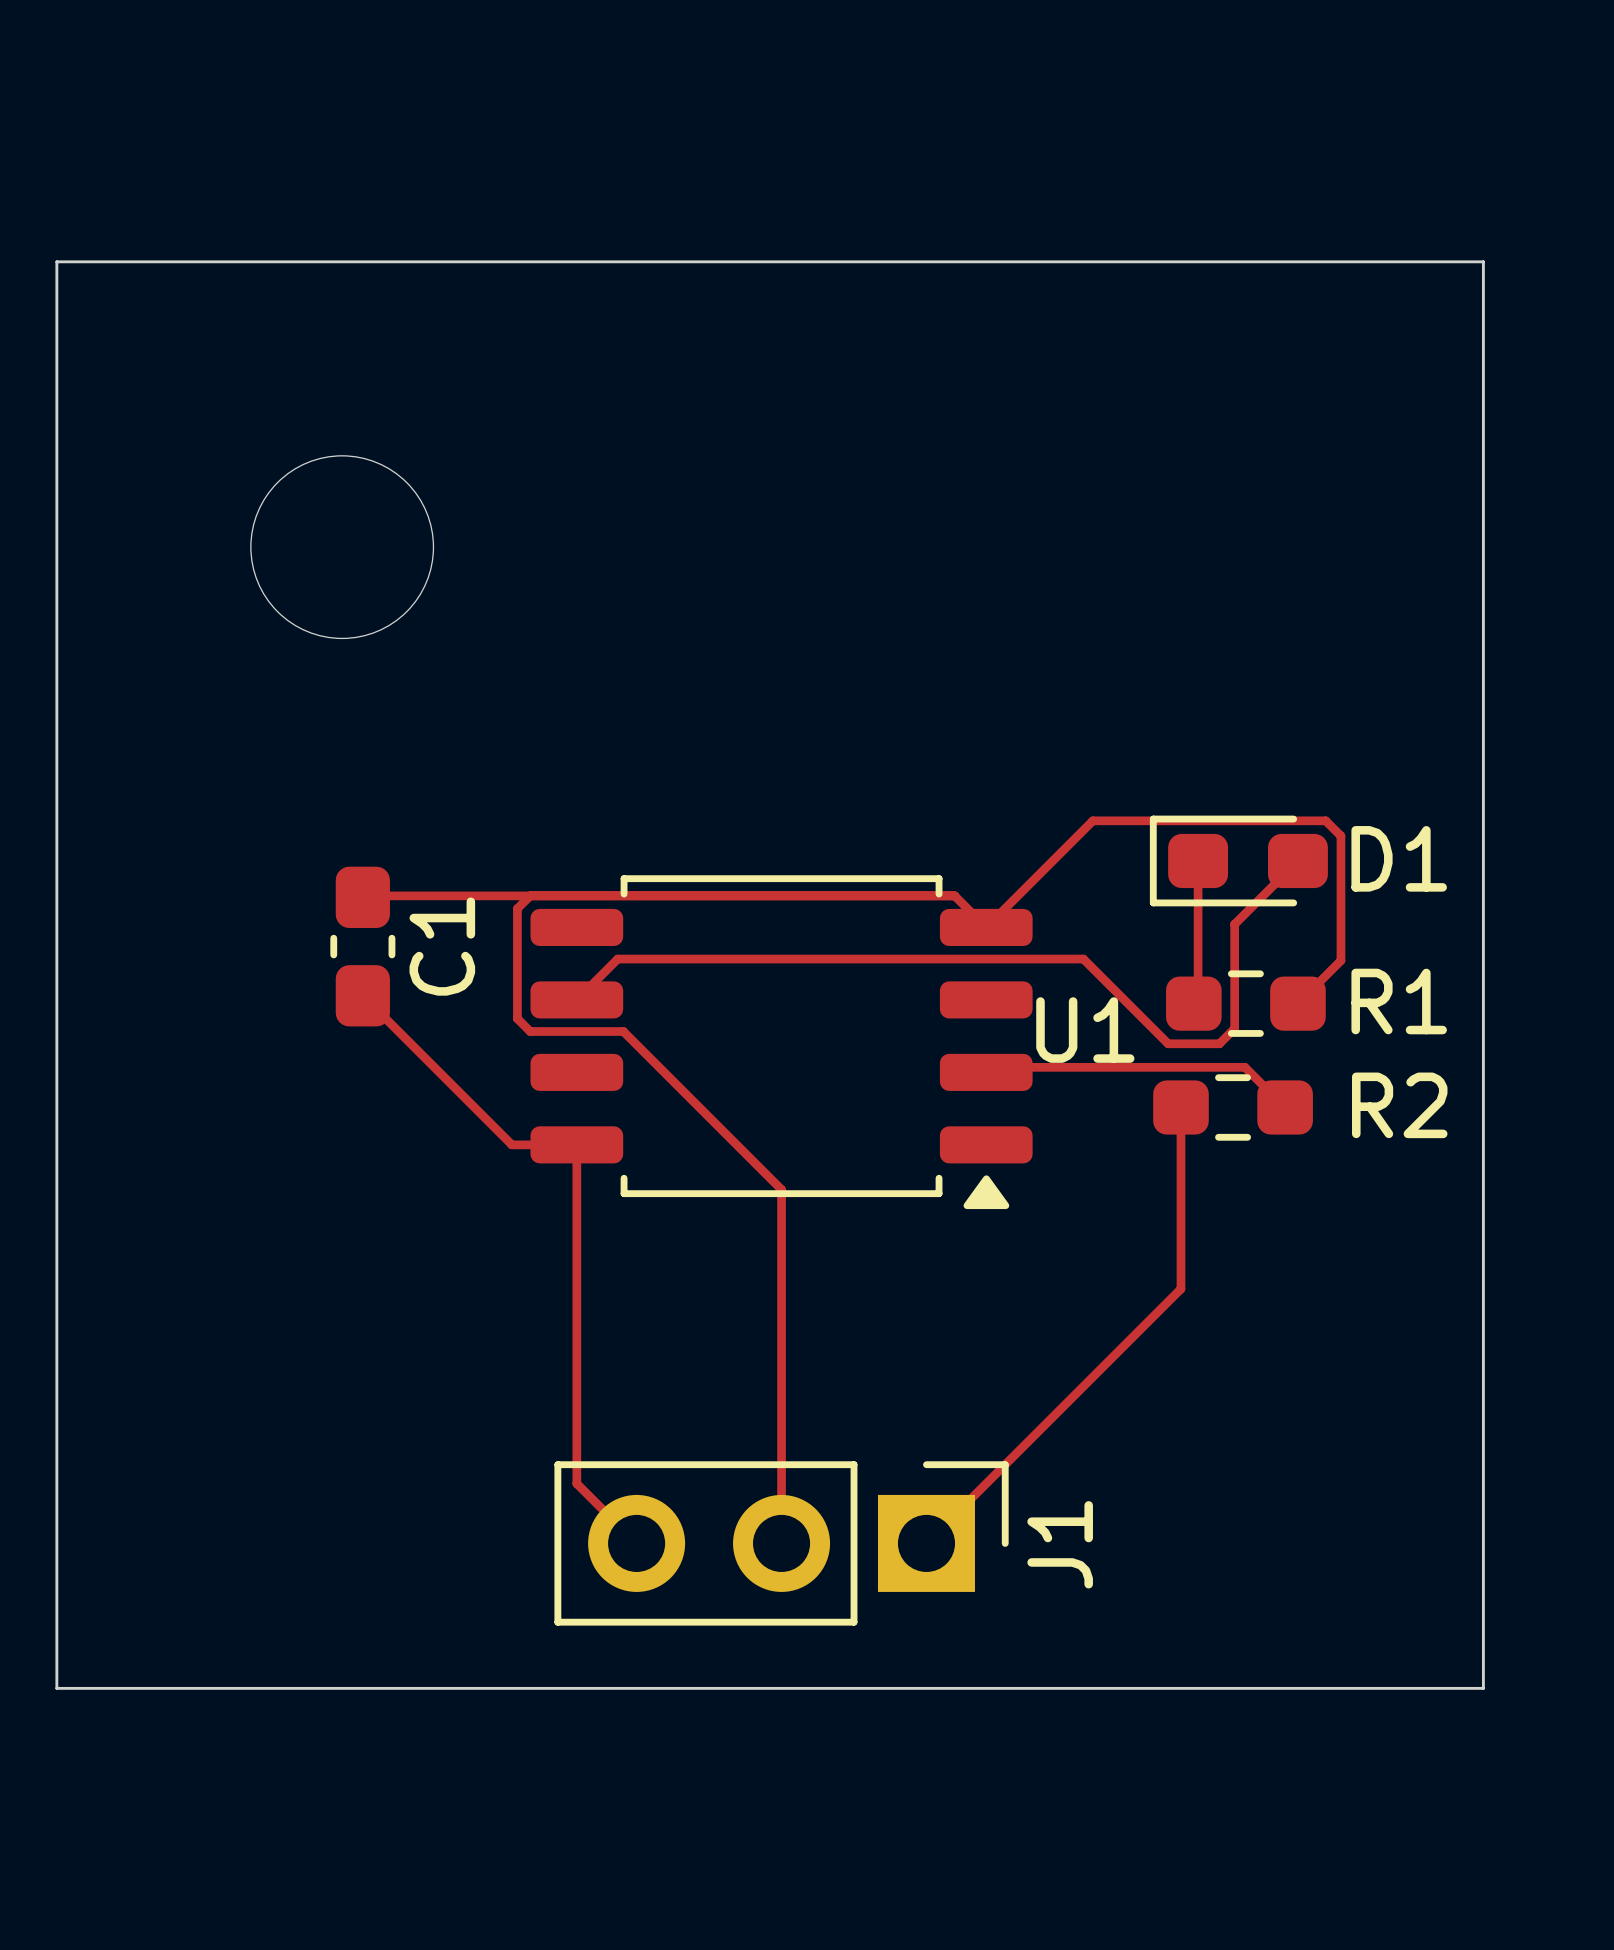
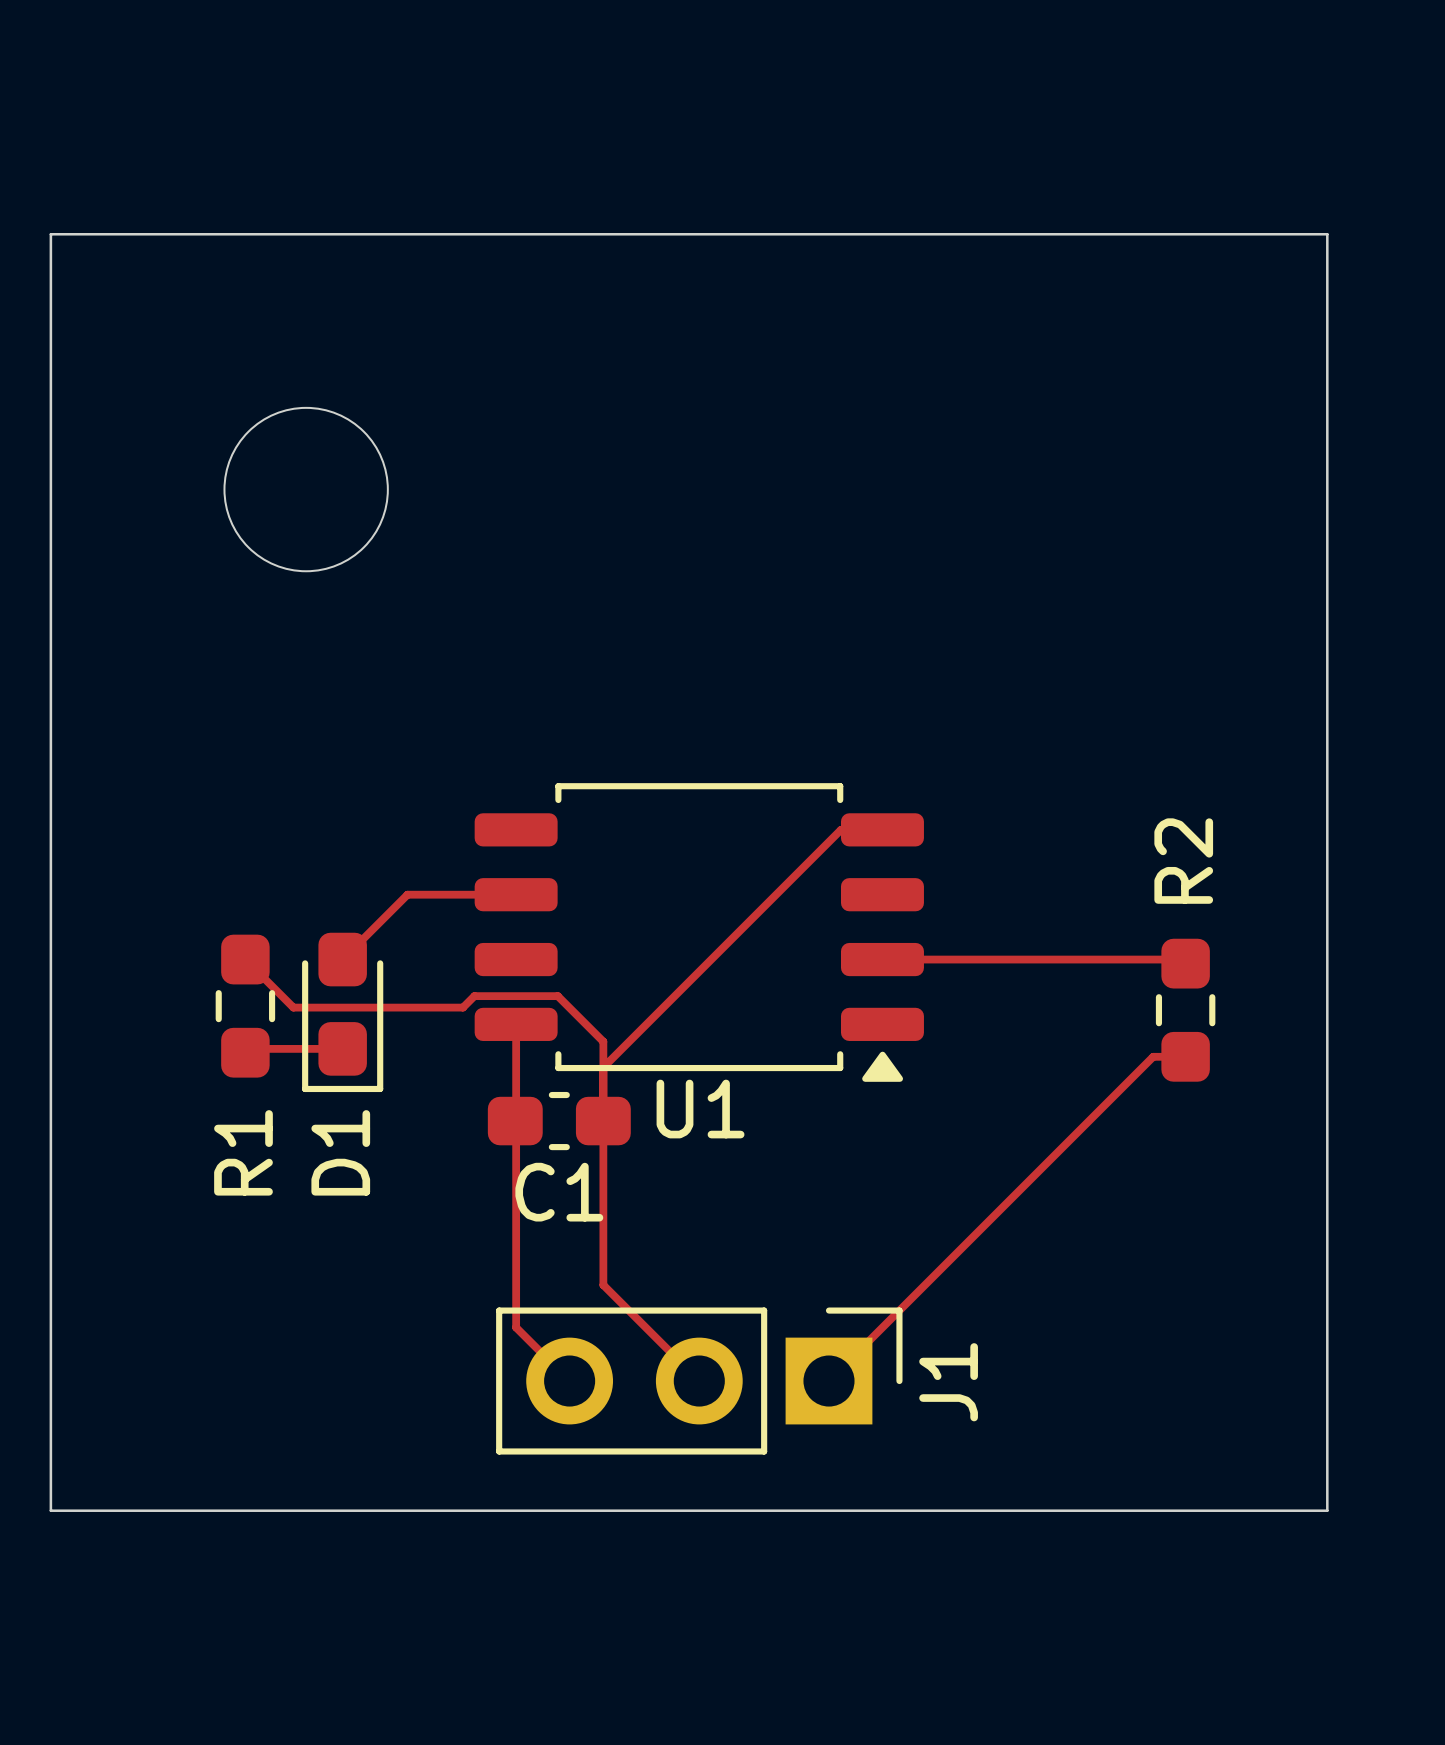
D1 name position: D1 (1399, 858) -> D1 (340, 1152)
top track: (1198, 860) (1198, 999) (1193, 1003) -> none
D1 rotation: 0° (1238, 860) -> 90° counterclockwise (342, 1012)
D1 position: (1238, 860) -> (342, 1012)
top track: (1297, 860) (1234, 924) (1234, 1028) (1219, 1043) (1168, 1043) (1083, 959) (617, 959) (576, 999) -> (342, 959) (407, 894) (516, 894)
top track: (530, 895) (517, 908) (517, 1018) (530, 1031) (623, 1031) (781, 1189) (781, 1543) -> (245, 959) (293, 1007) (462, 1007) (474, 996) (557, 996) (603, 1041) (603, 1285) (699, 1381)
top track: (362, 897) (954, 895) (986, 927) (1092, 820) (1325, 820) (1340, 836) (1340, 960) (1297, 1003) -> none
top track: none -> (882, 829) (840, 829) (603, 1067)
C1 rotation: 0° (362, 946) -> 90° clockwise (559, 1121)
C1 position: (362, 946) -> (559, 1121)
top track: (362, 995) (511, 1144) (576, 1144) -> none
R1 rotation: 0° (1245, 1003) -> 90° clockwise (245, 1006)
R1 position: (1245, 1003) -> (245, 1006)
U1 name position: U1 (1085, 1030) -> U1 (700, 1109)
top track: (986, 1072) (991, 1067) (1244, 1067) (1285, 1107) -> (882, 959) (1181, 959) (1185, 963)
R2 name position: R2 (1399, 1105) -> R2 (1183, 861)
top track: (1180, 1107) (1180, 1288) -> (1185, 1056) (1153, 1056) (1056, 1153)
R2 rotation: 0° (1233, 1107) -> 90° clockwise (1185, 1010)
top track: none -> (342, 1048) (249, 1048) (245, 1052)

